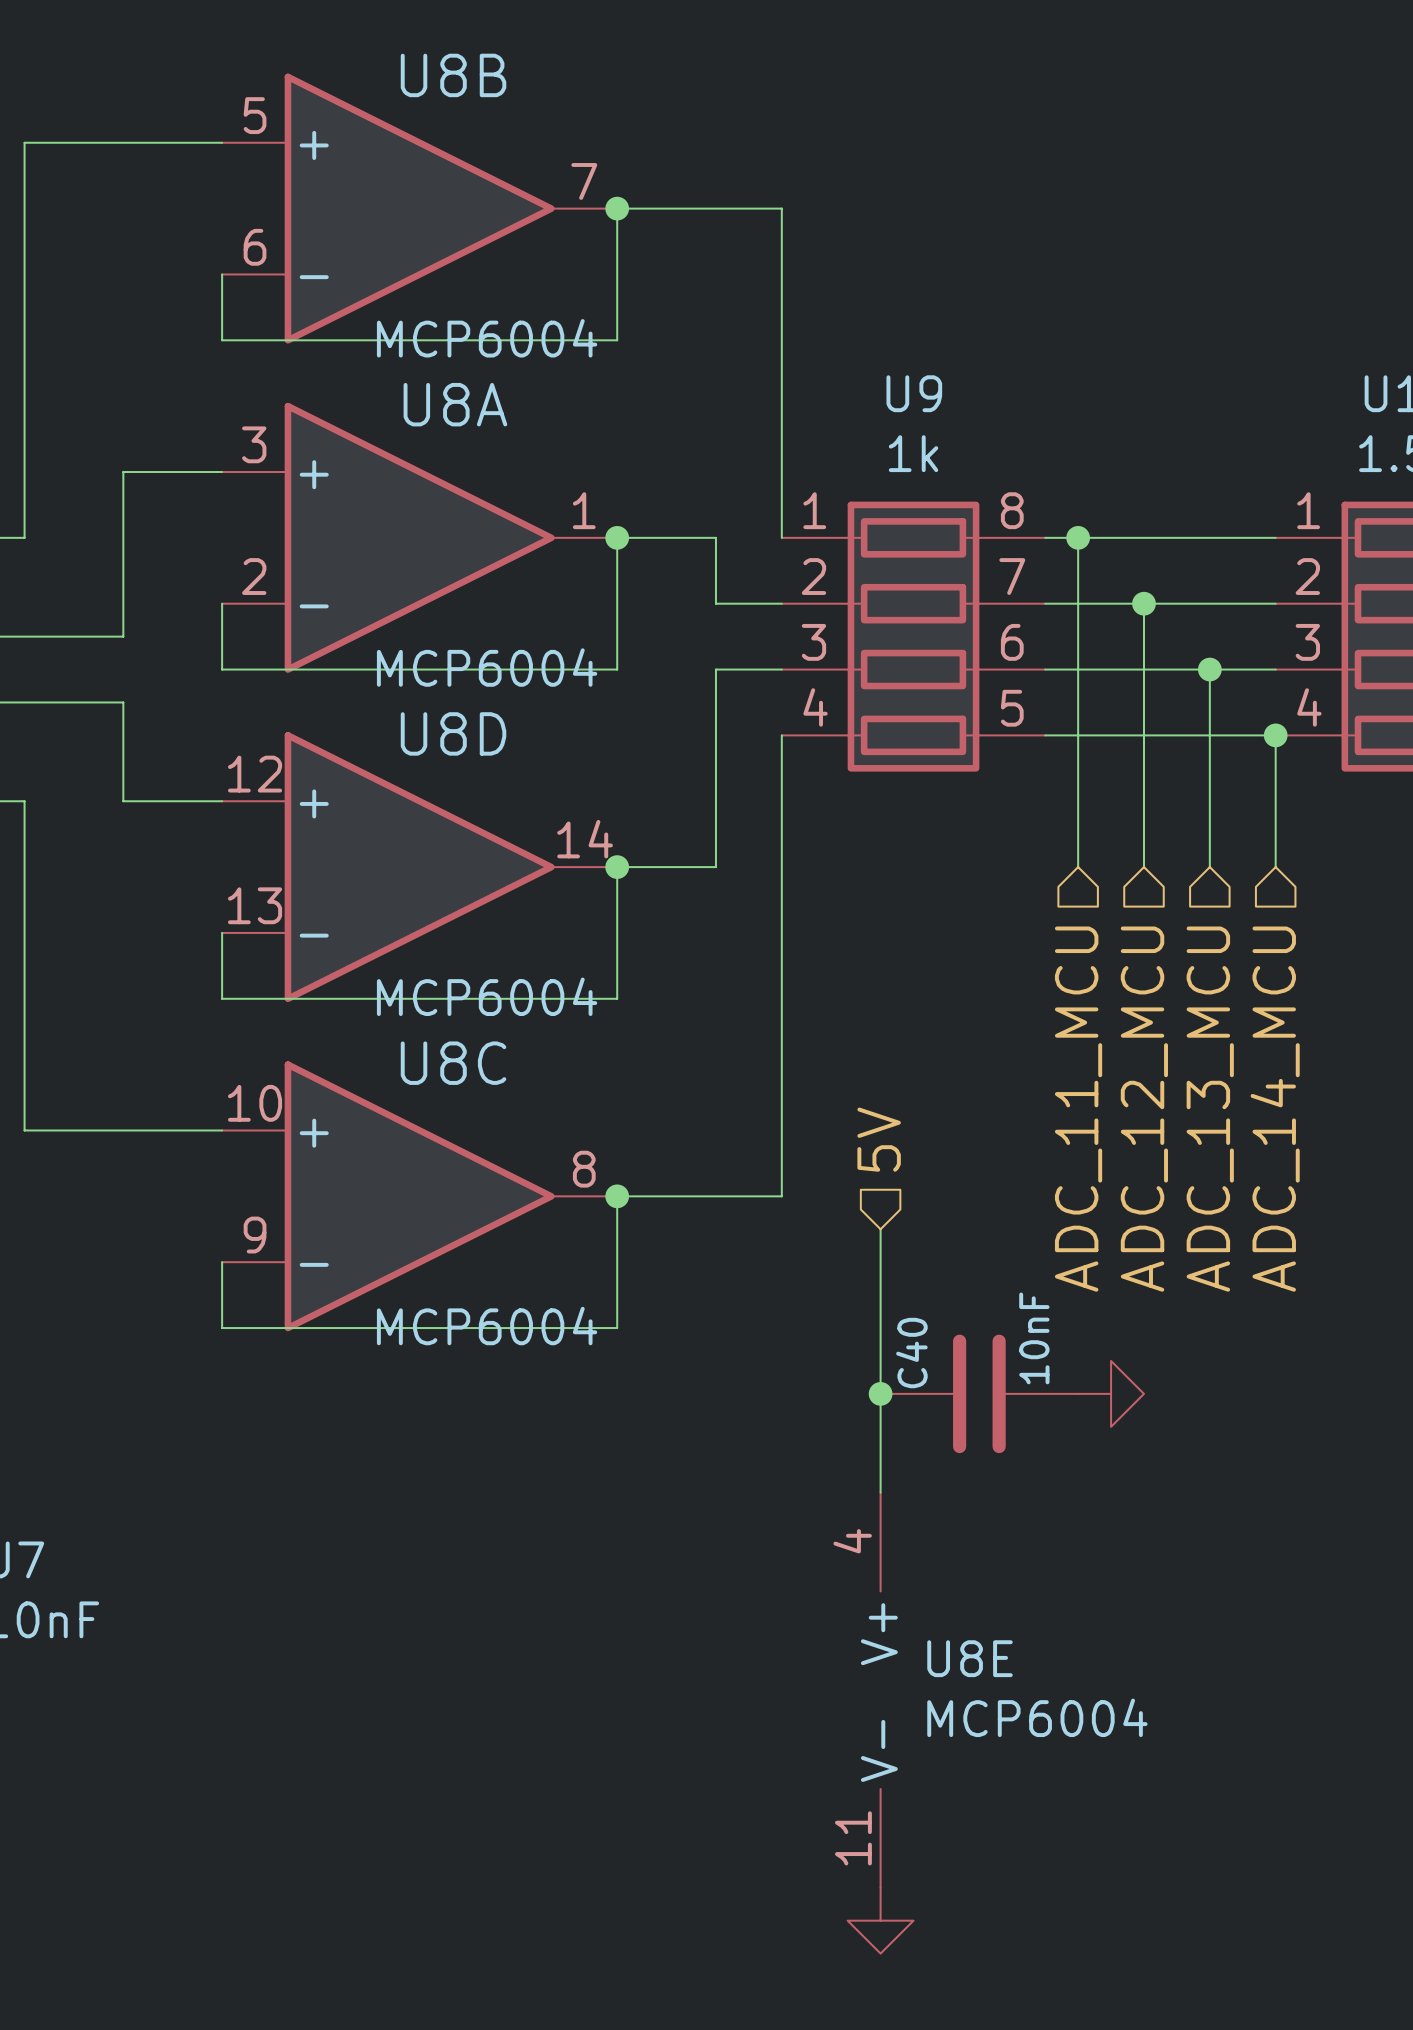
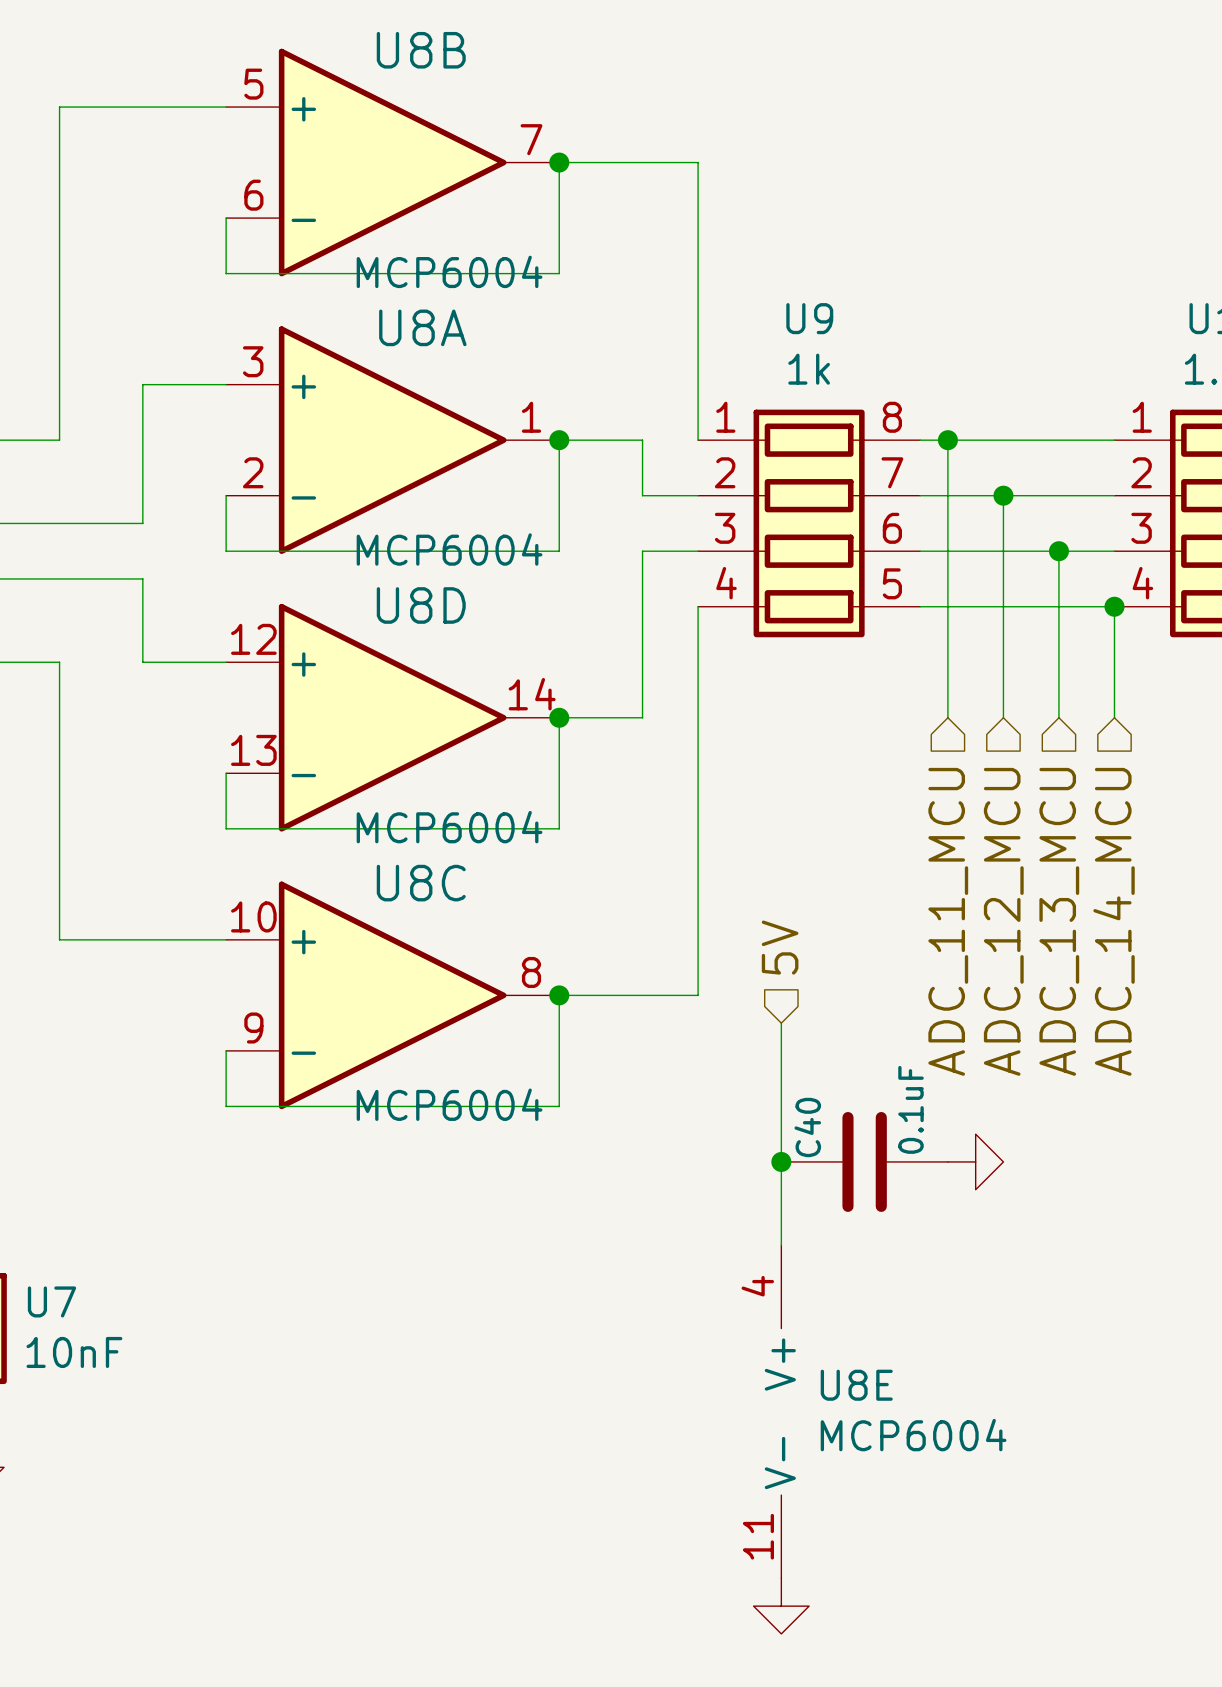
C40 value: 10nF (1034, 1338) -> 0.1uF (910, 1109)

